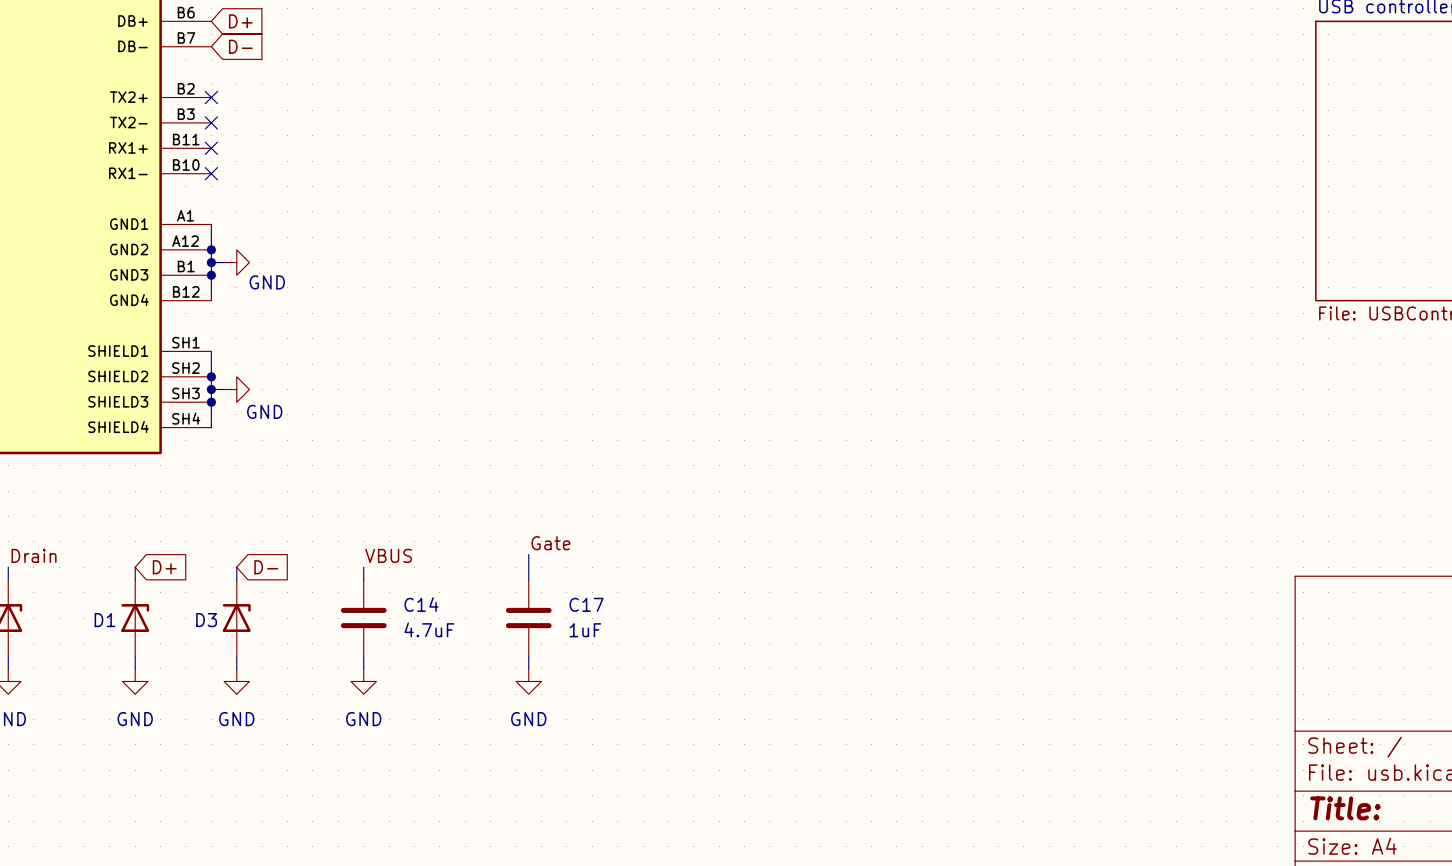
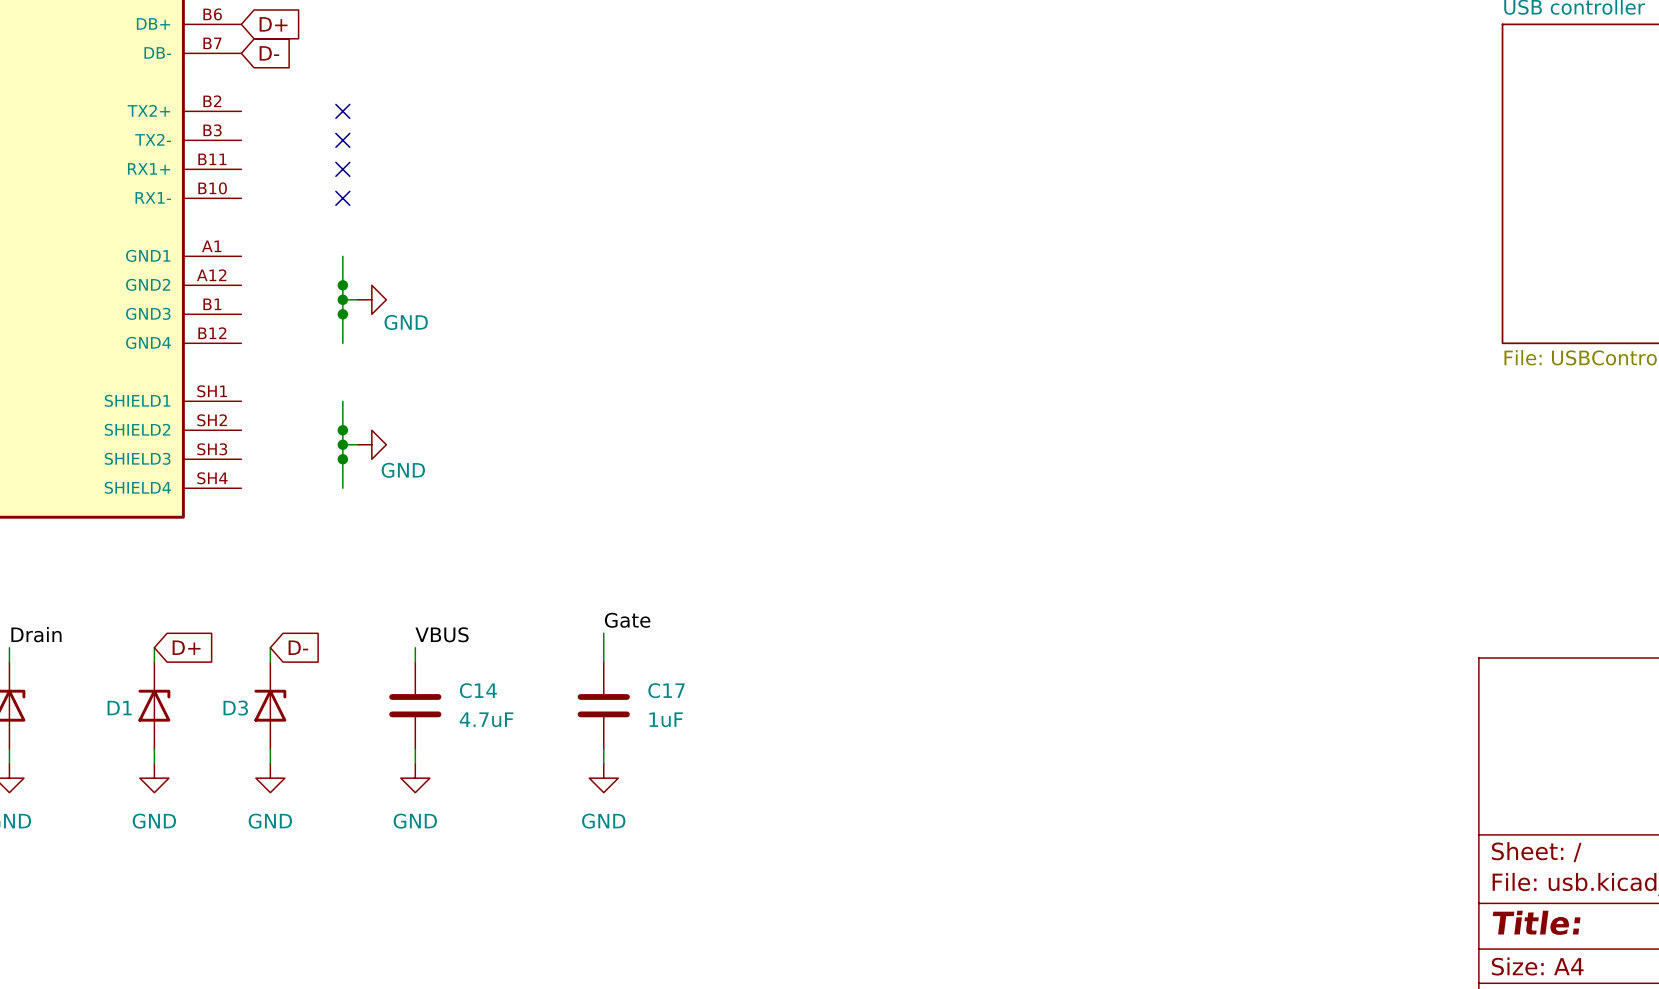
no-connect mark: (211, 97) -> none
no-connect mark: none -> (342, 111)
no-connect mark: (211, 122) -> none
no-connect mark: none -> (342, 140)
no-connect mark: (211, 148) -> none
no-connect mark: none -> (342, 169)
no-connect mark: (211, 173) -> none
no-connect mark: none -> (342, 198)
wire: (211, 224) (211, 300) -> (342, 256) (342, 343)
junction: (211, 249) -> none
junction: none -> (342, 285)
wire: (211, 262) (224, 262) -> (342, 299) (357, 299)
junction: (211, 262) -> none
power symbol: GND (236, 262) -> none
junction: none -> (342, 299)
power symbol: none -> GND (371, 299)
junction: (211, 275) -> none
junction: none -> (342, 314)
wire: (211, 351) (211, 427) -> (342, 401) (342, 488)
junction: (211, 376) -> none
junction: none -> (342, 430)
wire: (211, 389) (224, 389) -> (342, 444) (357, 444)
junction: (211, 389) -> none
power symbol: GND (236, 389) -> none
junction: none -> (342, 444)
power symbol: none -> GND (371, 444)
junction: (211, 402) -> none
junction: none -> (342, 459)

